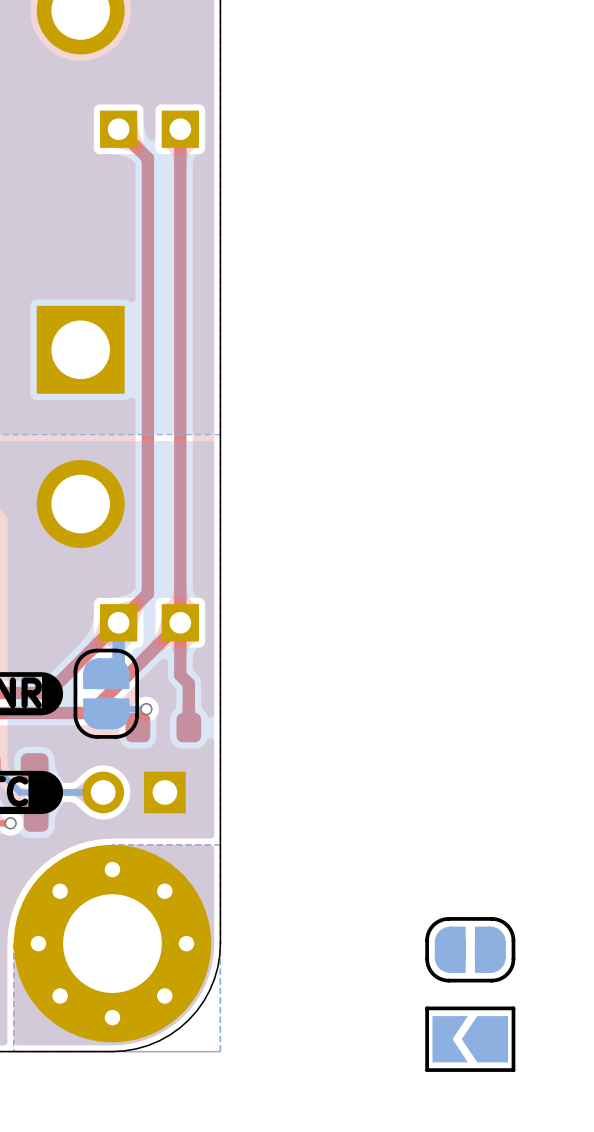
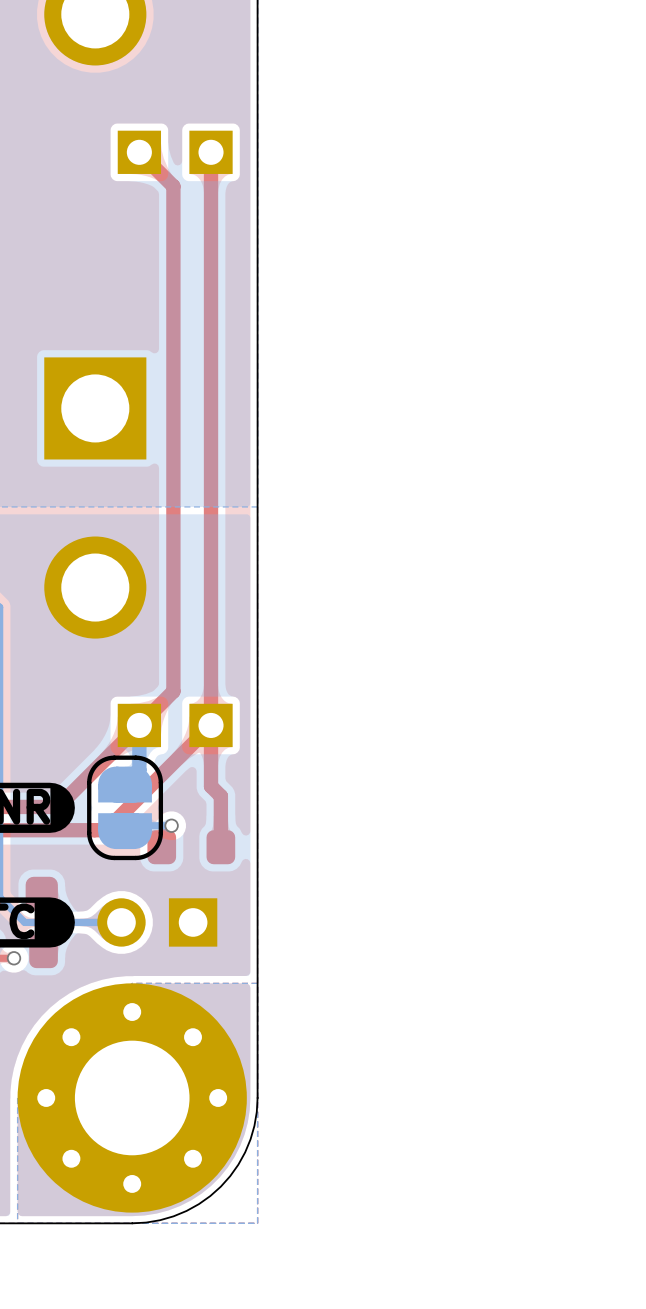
part: (470, 949) -> none
part: (470, 1039) -> none

